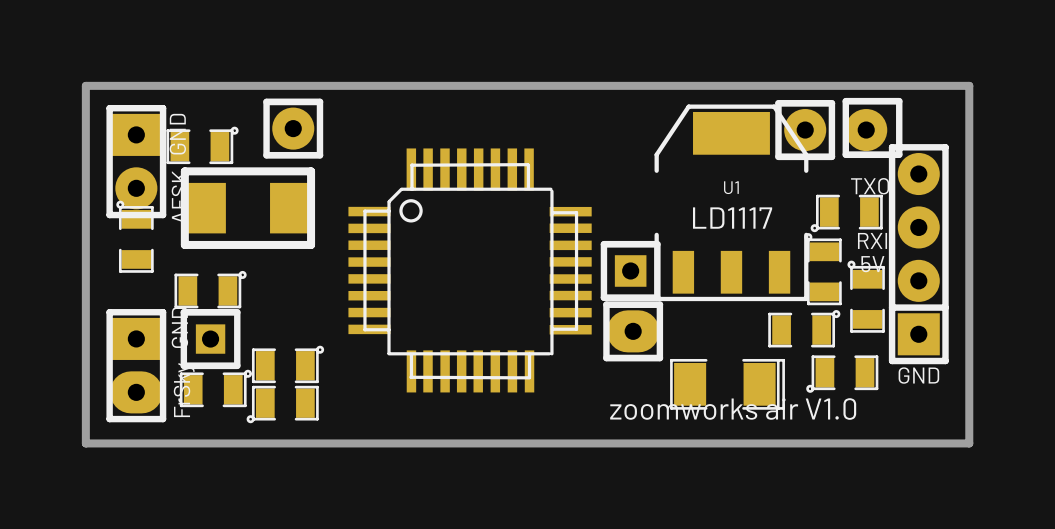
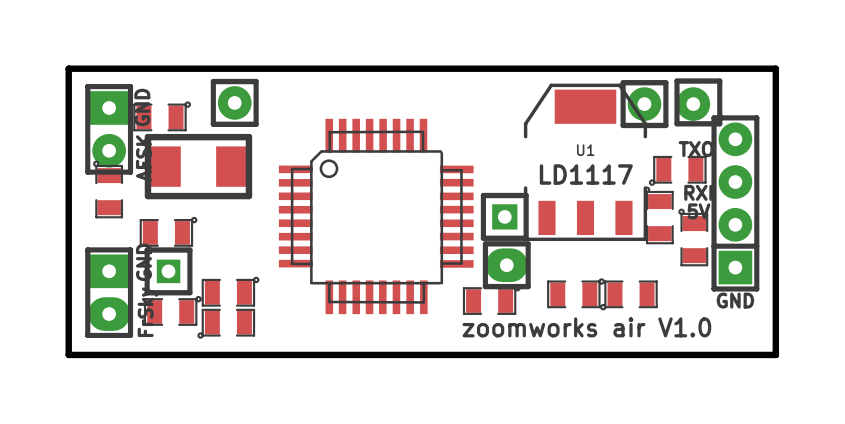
part: (804, 328) -> none
part footprint: [670, 358, 785, 410] -> [547, 278, 605, 309]
part: none -> (628, 295)
part: none -> (491, 299)
part: (842, 374) -> none

